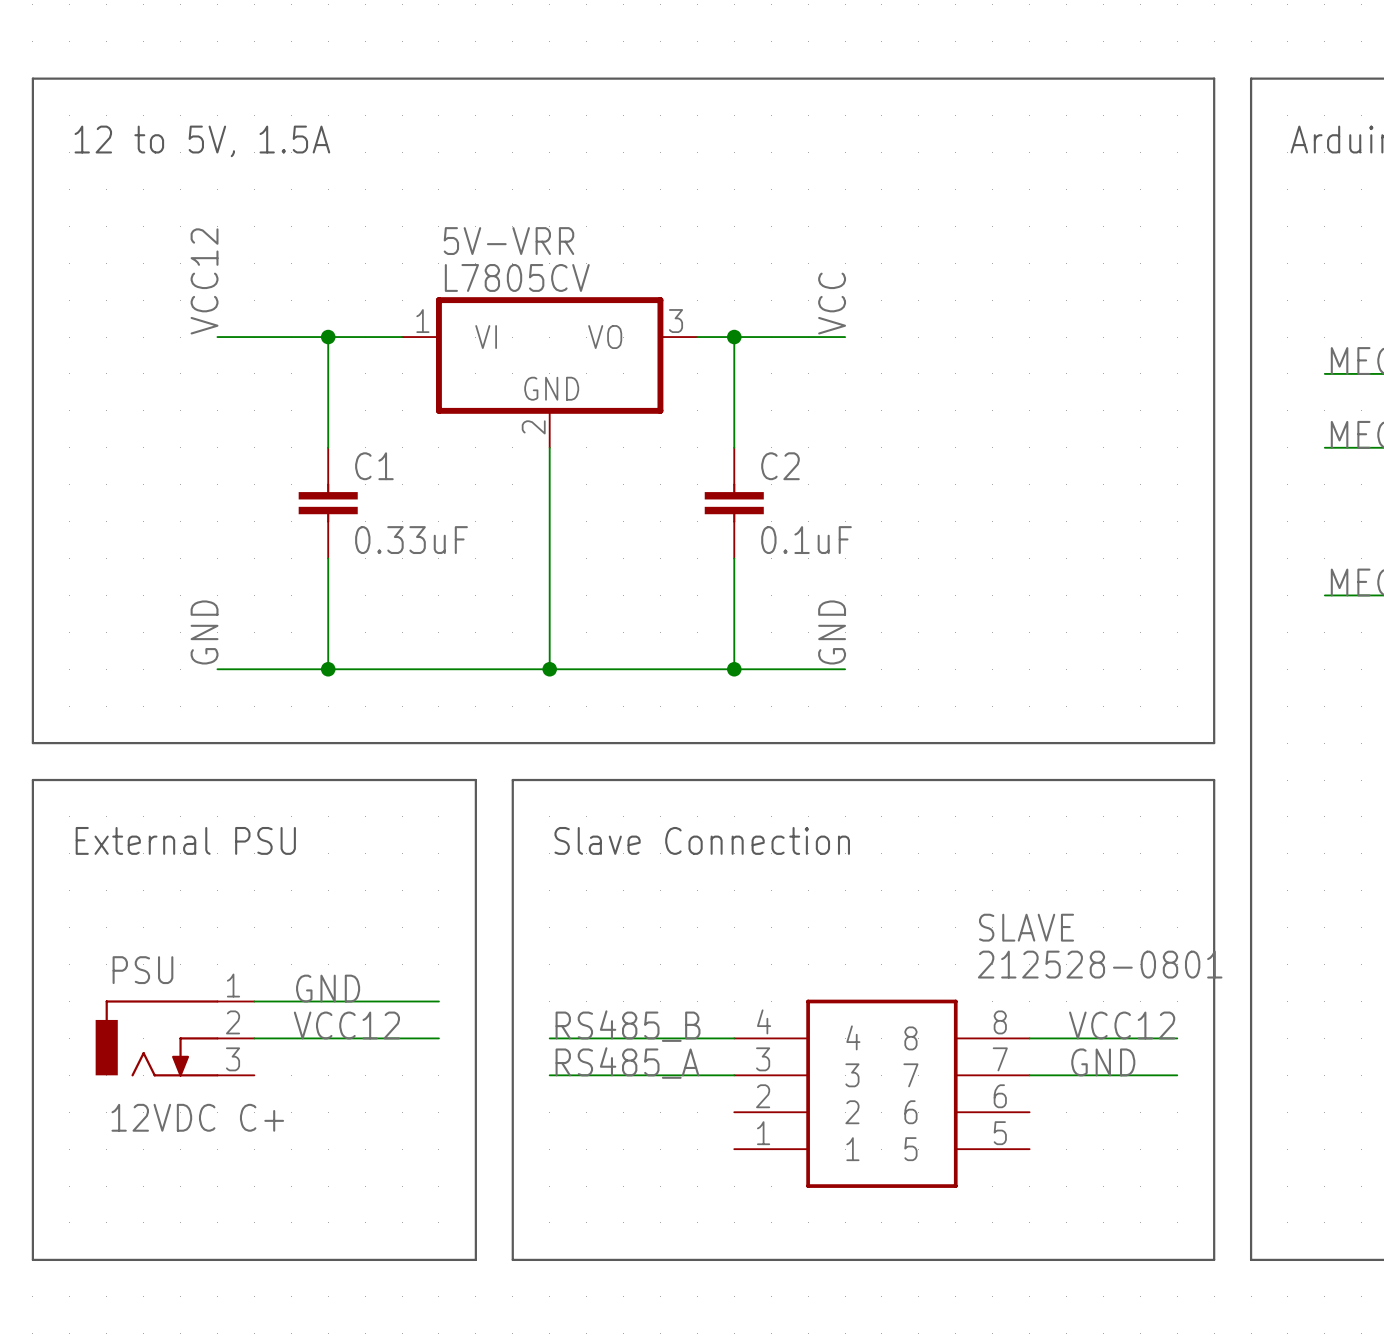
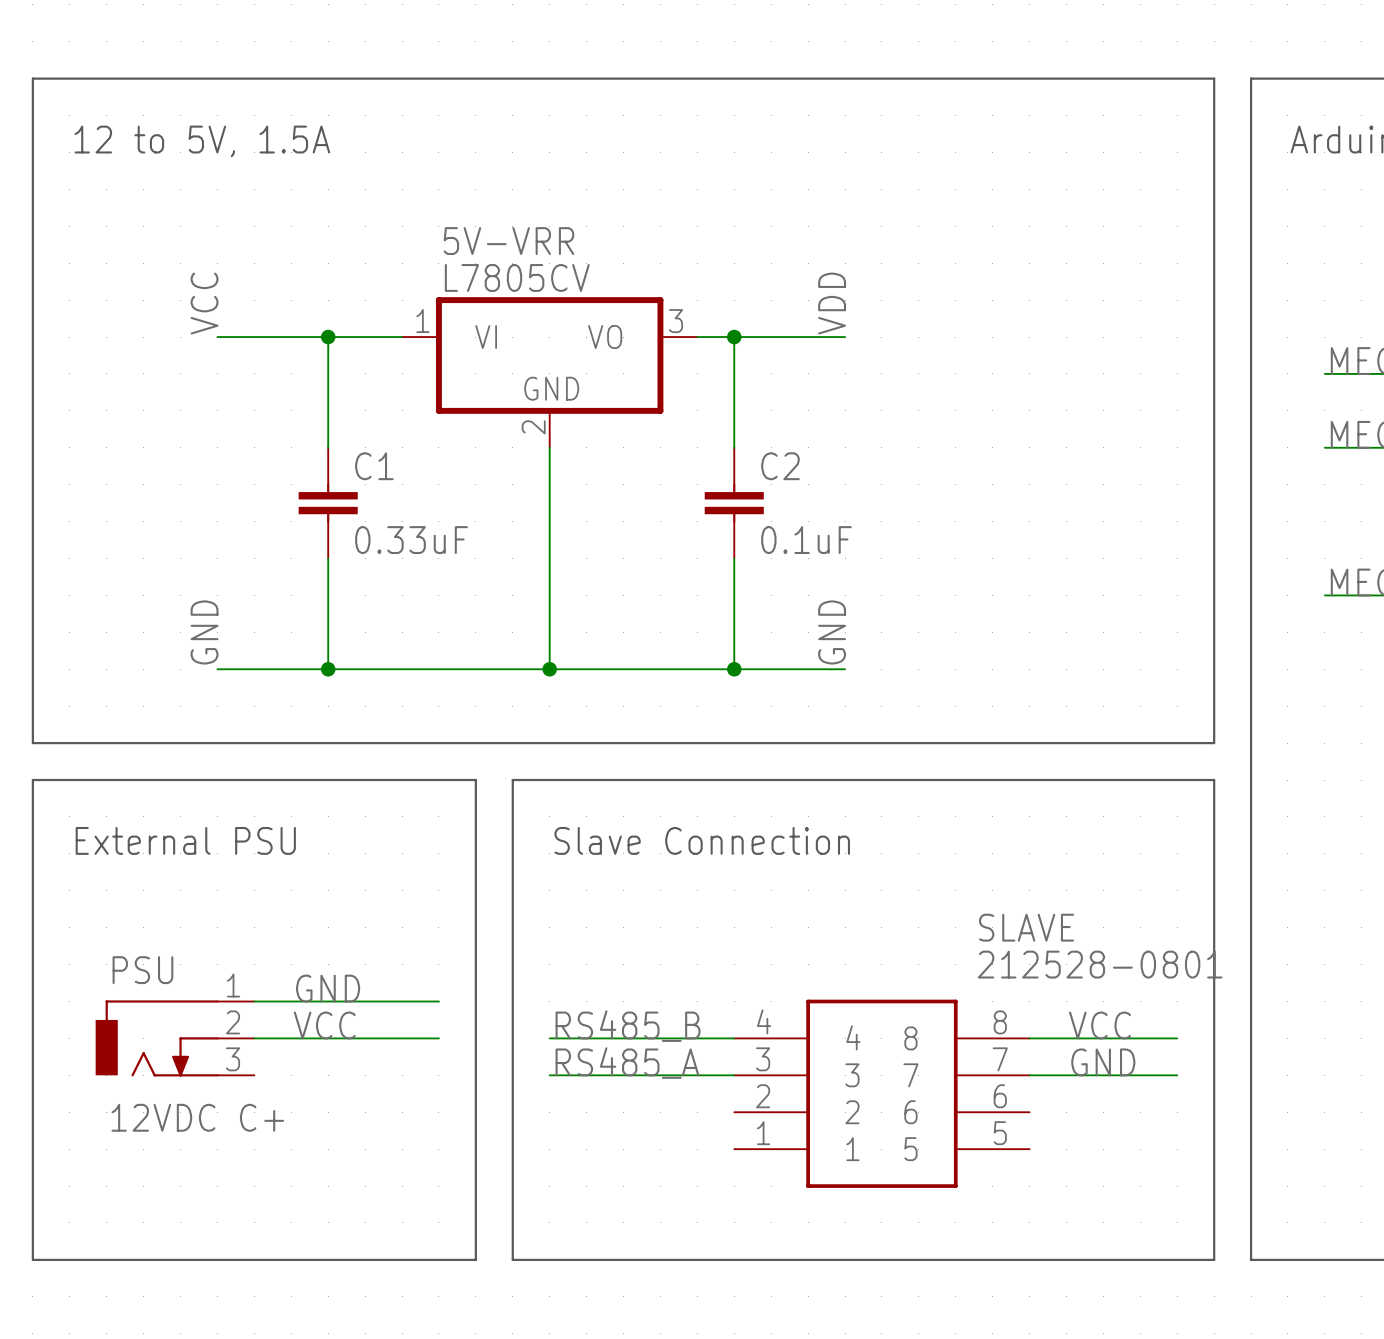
label: VCC12 (204, 281) -> VCC (204, 303)
label: VCC (832, 303) -> VDD (832, 303)
label: VCC12 (346, 1025) -> VCC (324, 1025)
label: VCC12 (1122, 1025) -> VCC (1099, 1025)

